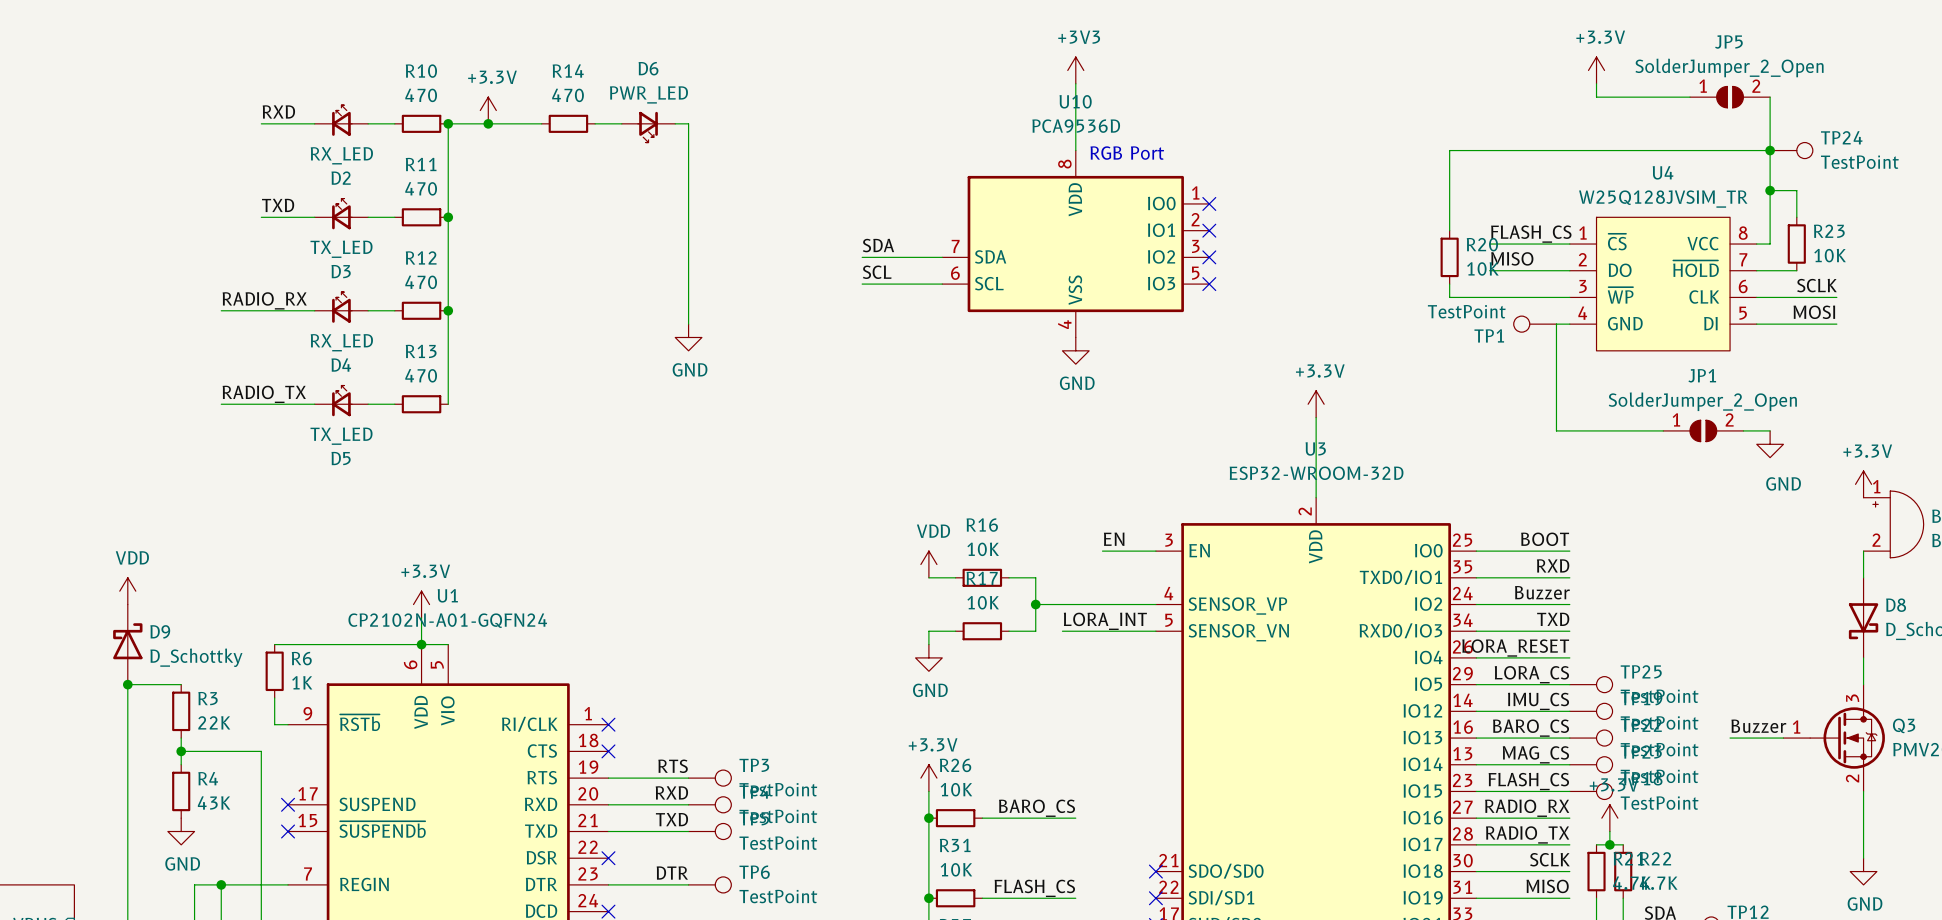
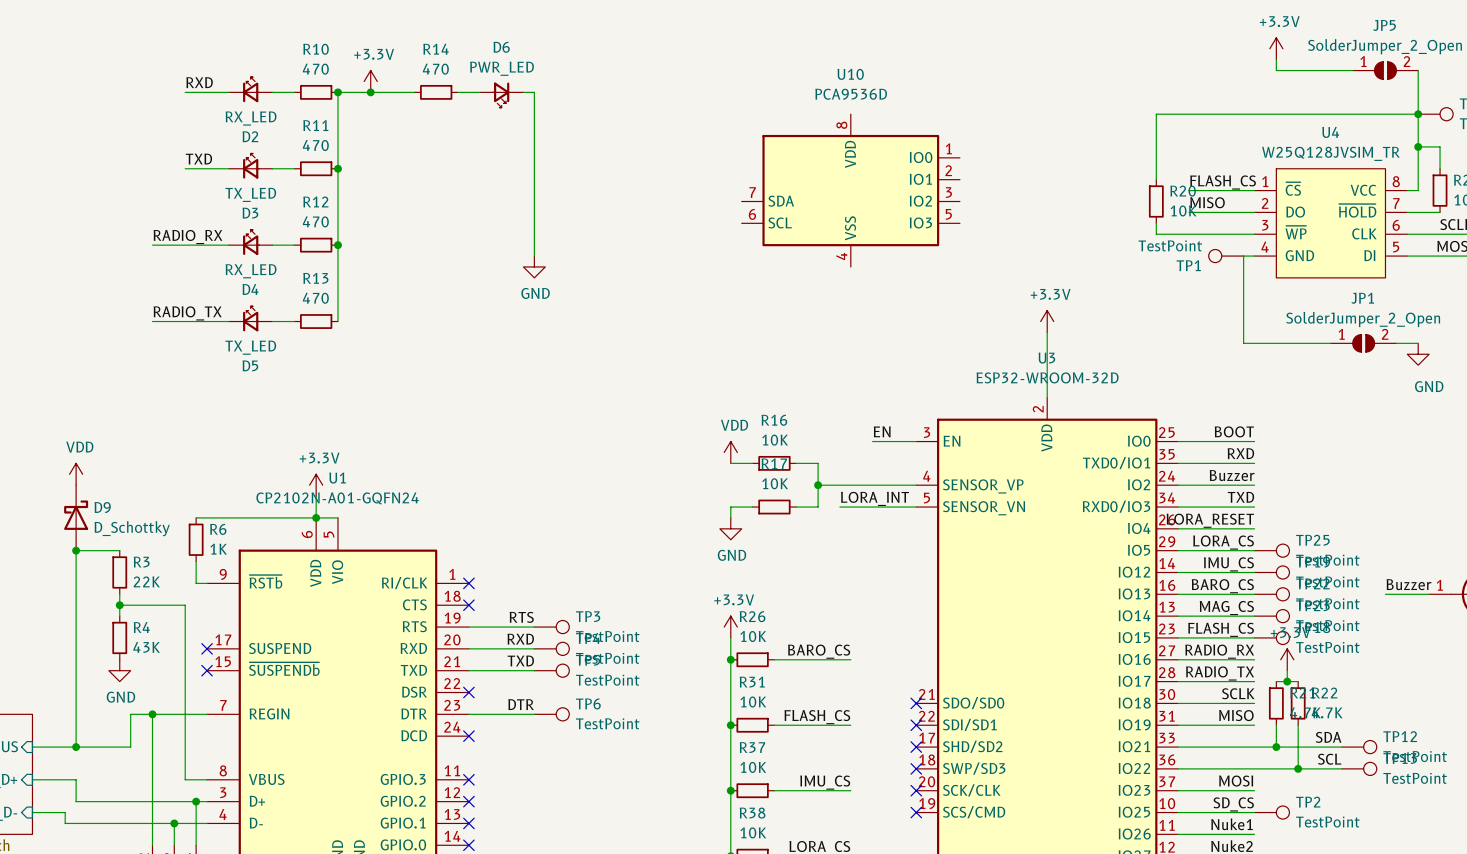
power symbol: +3V3 (1075, 70) -> none
wire: (1075, 83) (1075, 150) -> none
text: RGB Port (1127, 153) -> none
no-connect mark: (1209, 203) -> none
no-connect mark: (1209, 230) -> none
label: SDA (878, 245) -> none
wire: (862, 257) (942, 257) -> none
no-connect mark: (1209, 257) -> none
label: SCL (877, 272) -> none
wire: (862, 284) (942, 284) -> none
no-connect mark: (1209, 284) -> none
power symbol: GND (1075, 350) -> none

